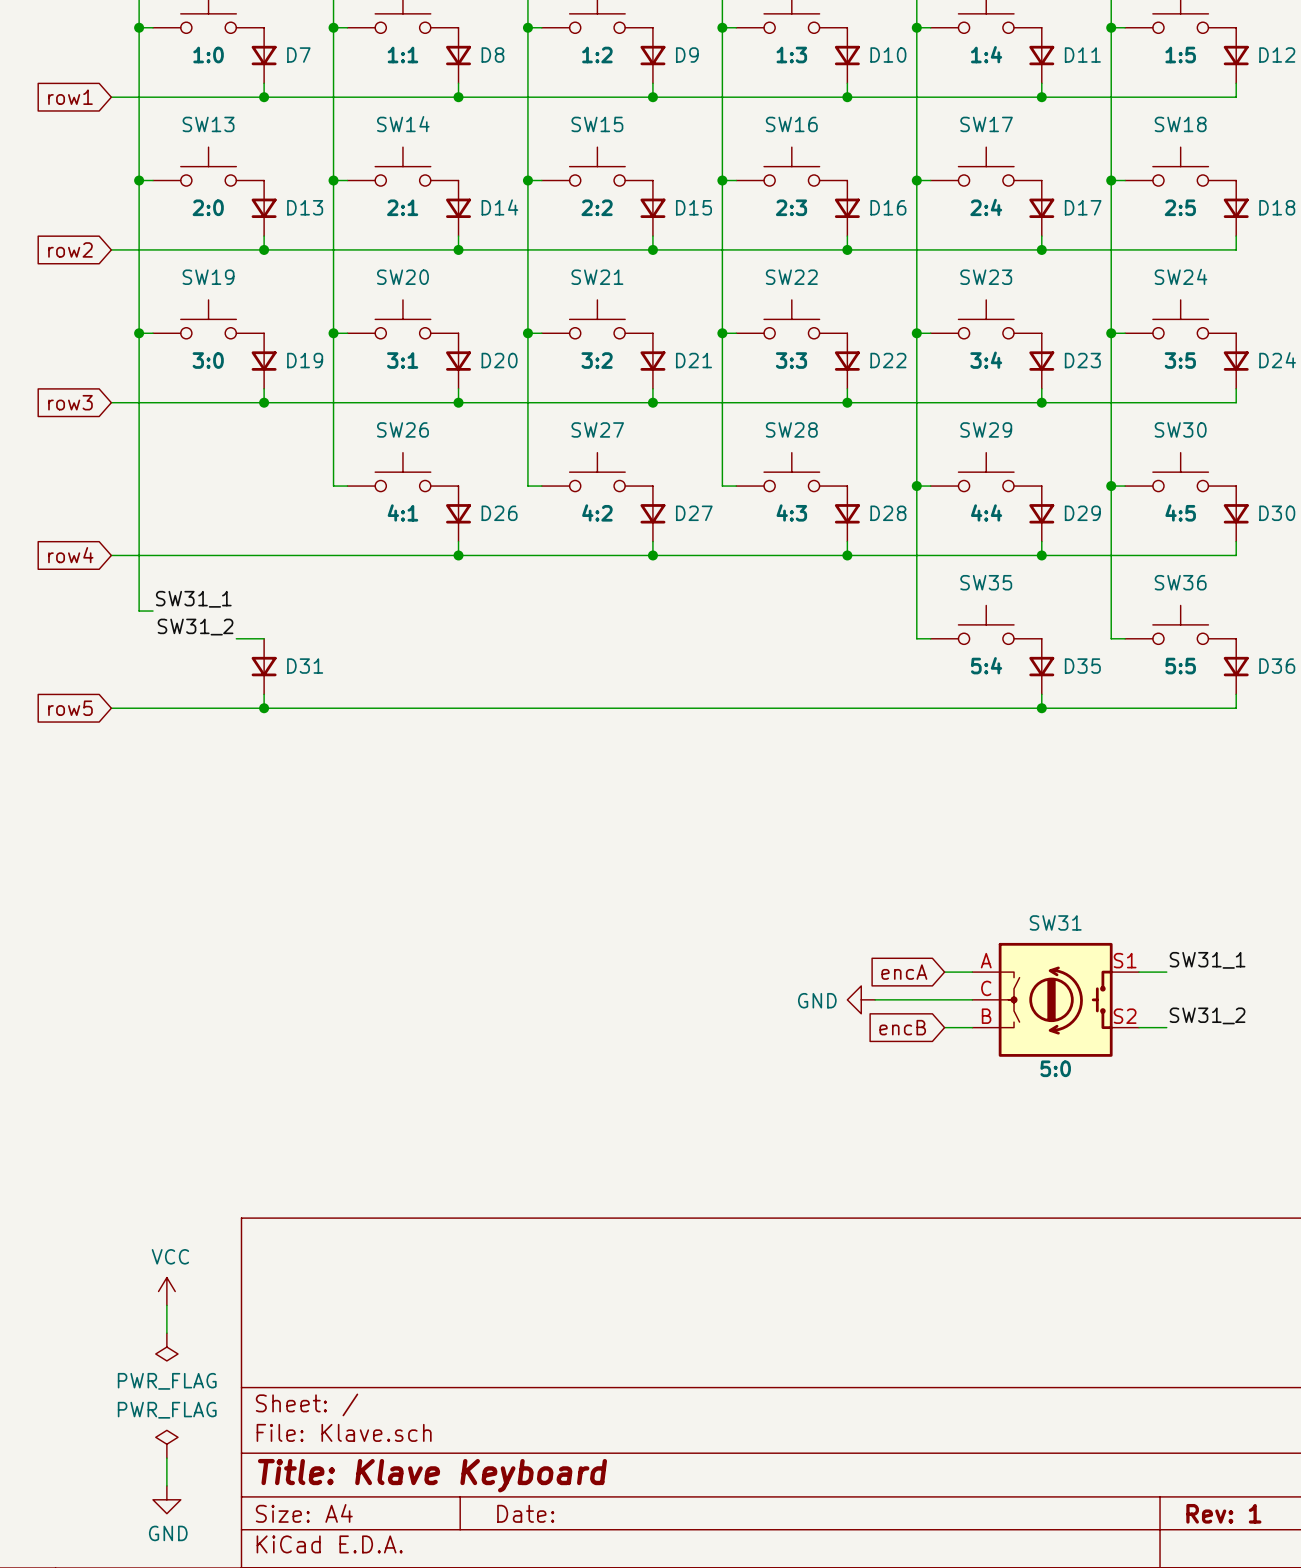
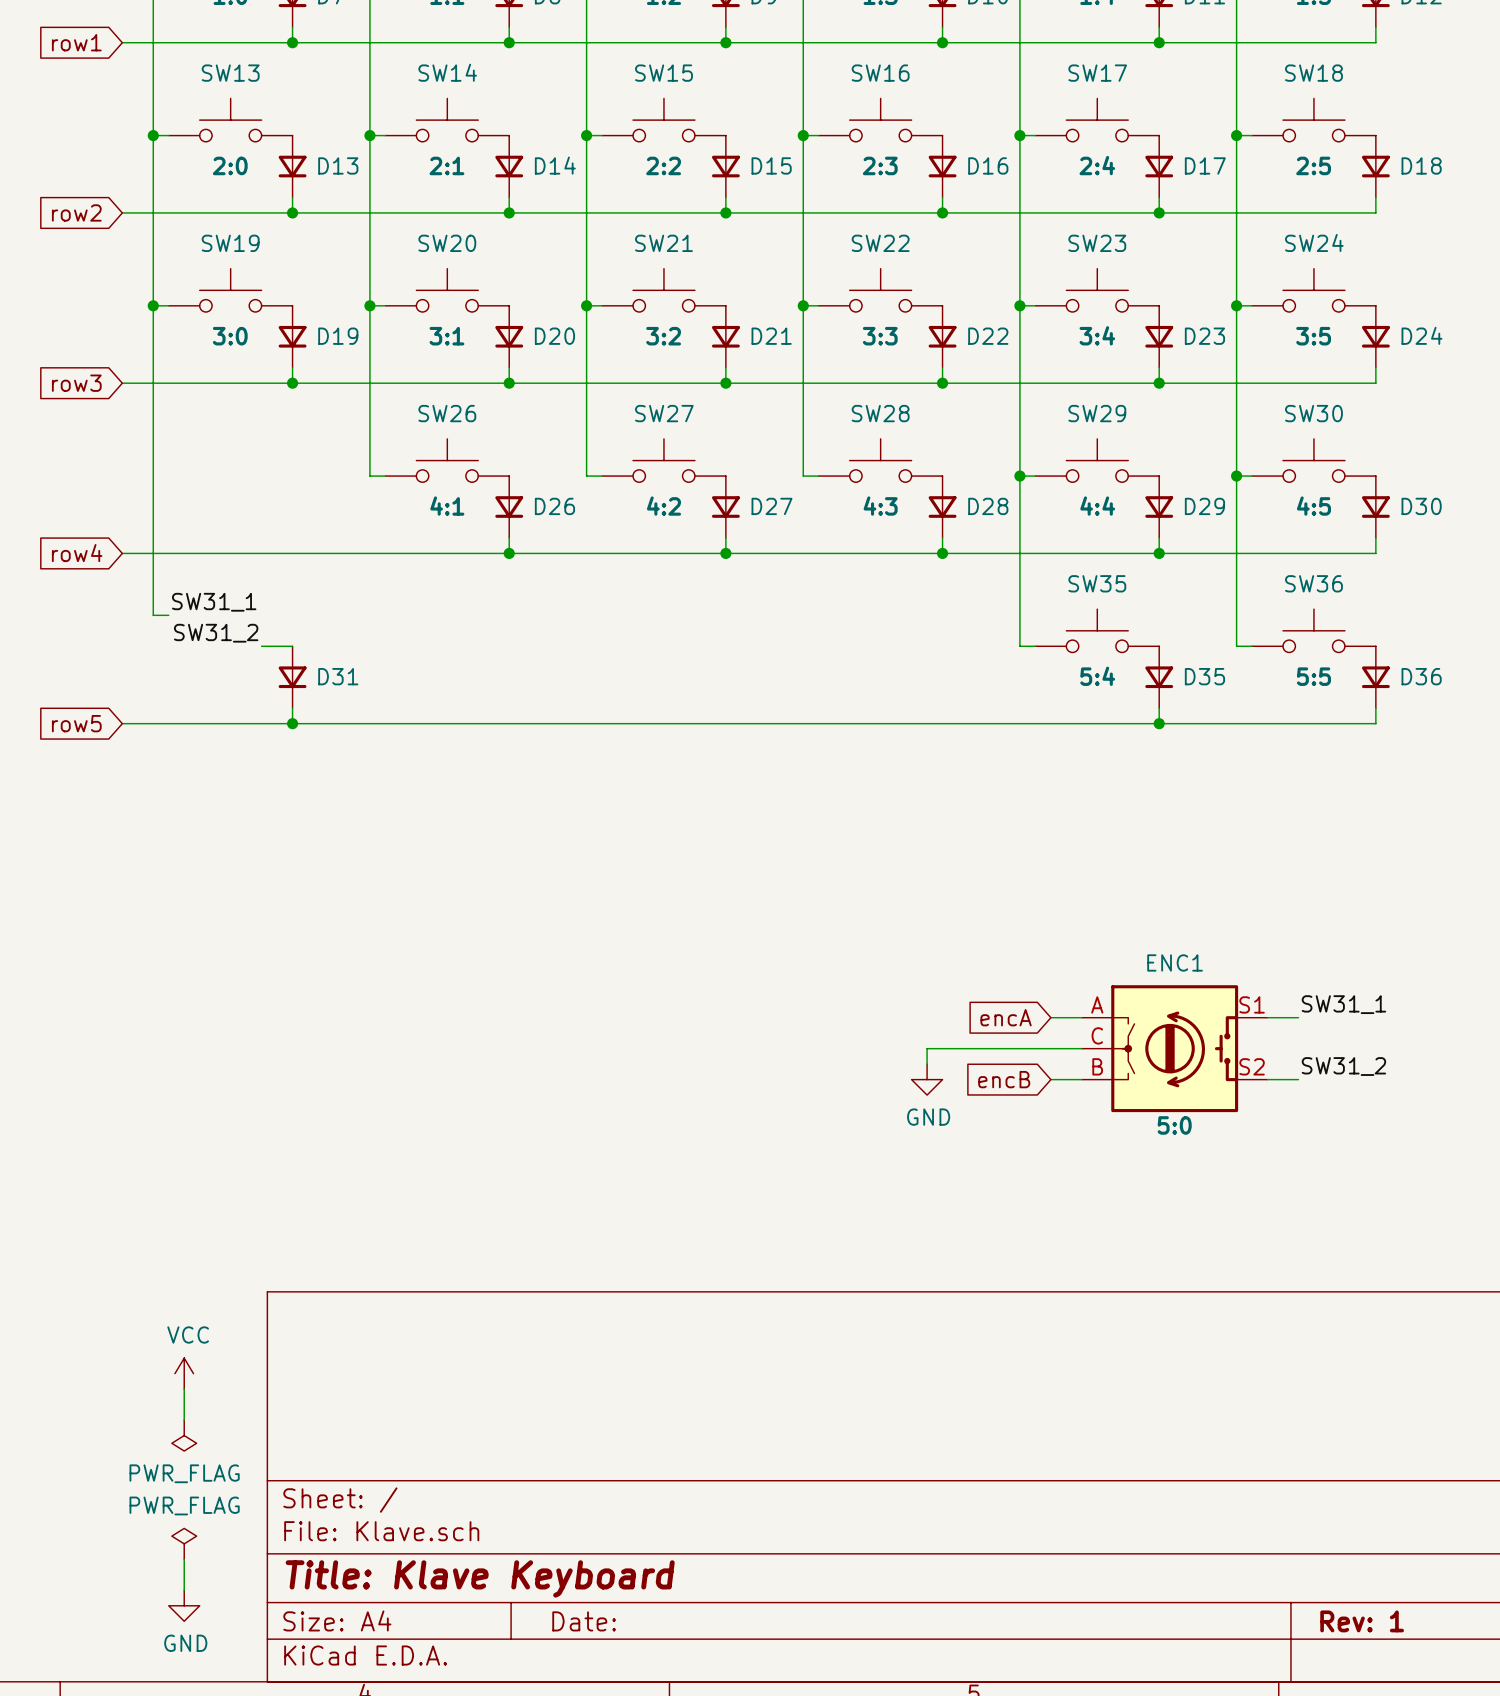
SW31 name: SW31 (1055, 922) -> ENC1 (1175, 962)
power symbol rotation: 0° (861, 999) -> 90° counterclockwise (927, 1079)
power symbol position: GND (861, 999) -> GND (927, 1079)
wire: none -> (973, 1048) (927, 1048) (927, 1064)

